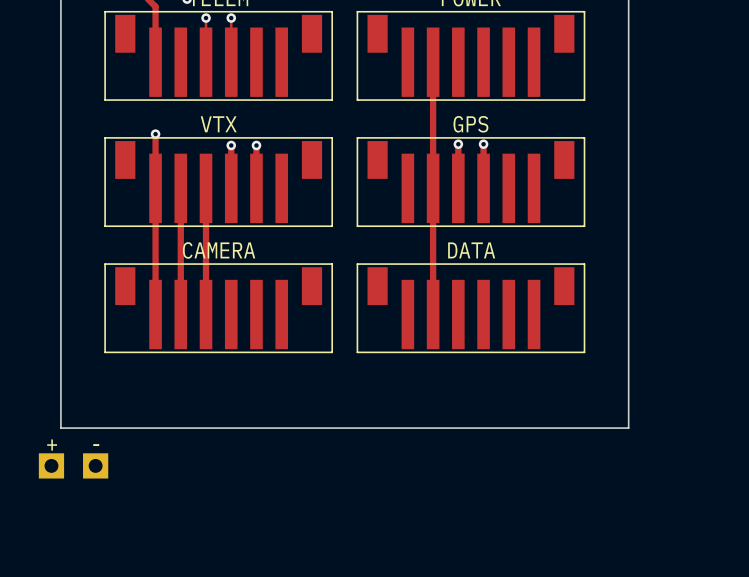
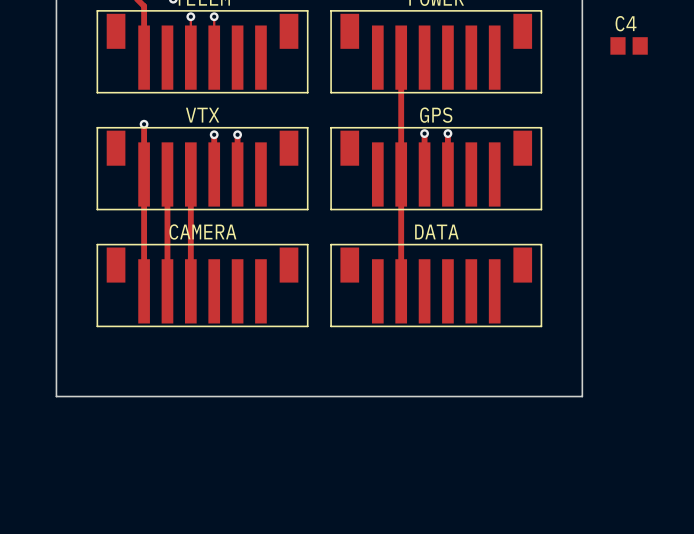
C4: none -> (629, 45)
part: (73, 465) -> none

